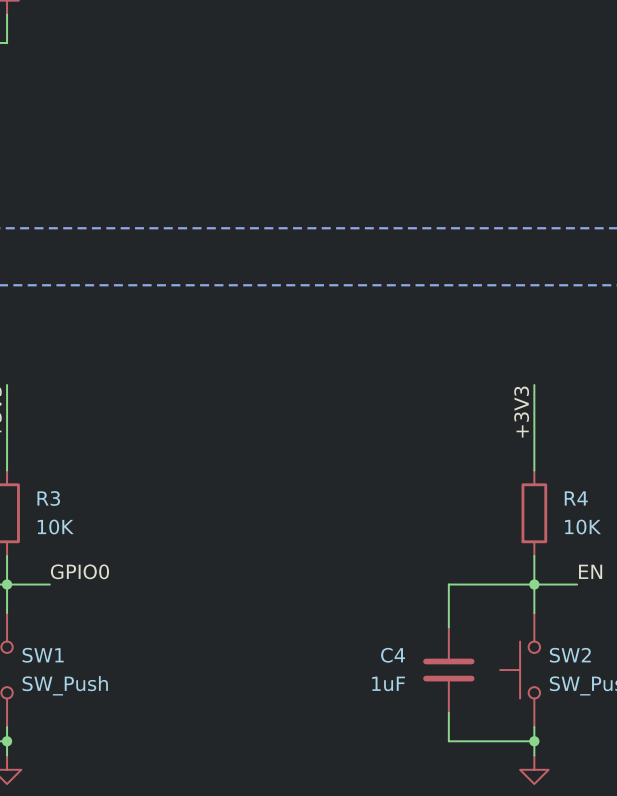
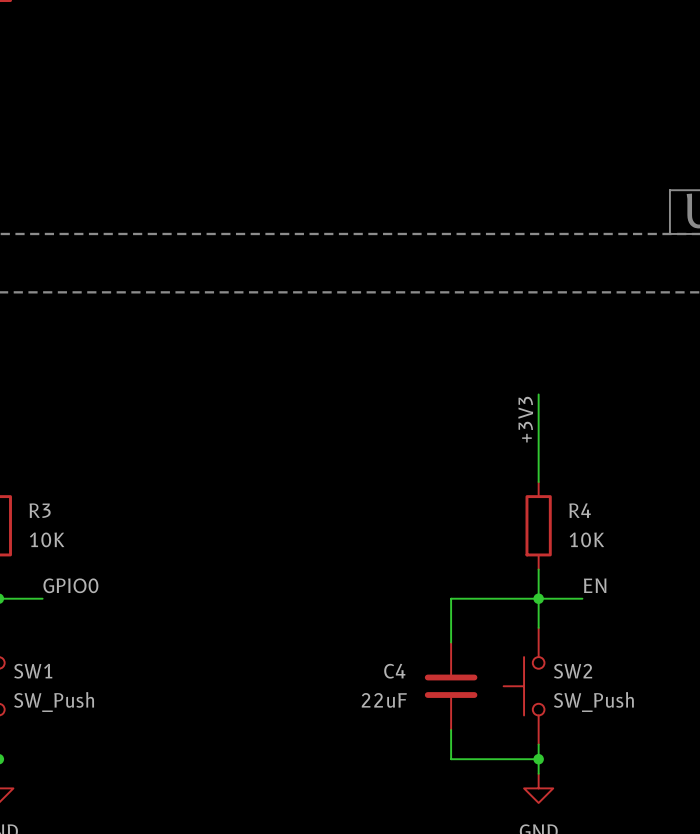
C4 value: 1uF (388, 683) -> 22uF (384, 700)

